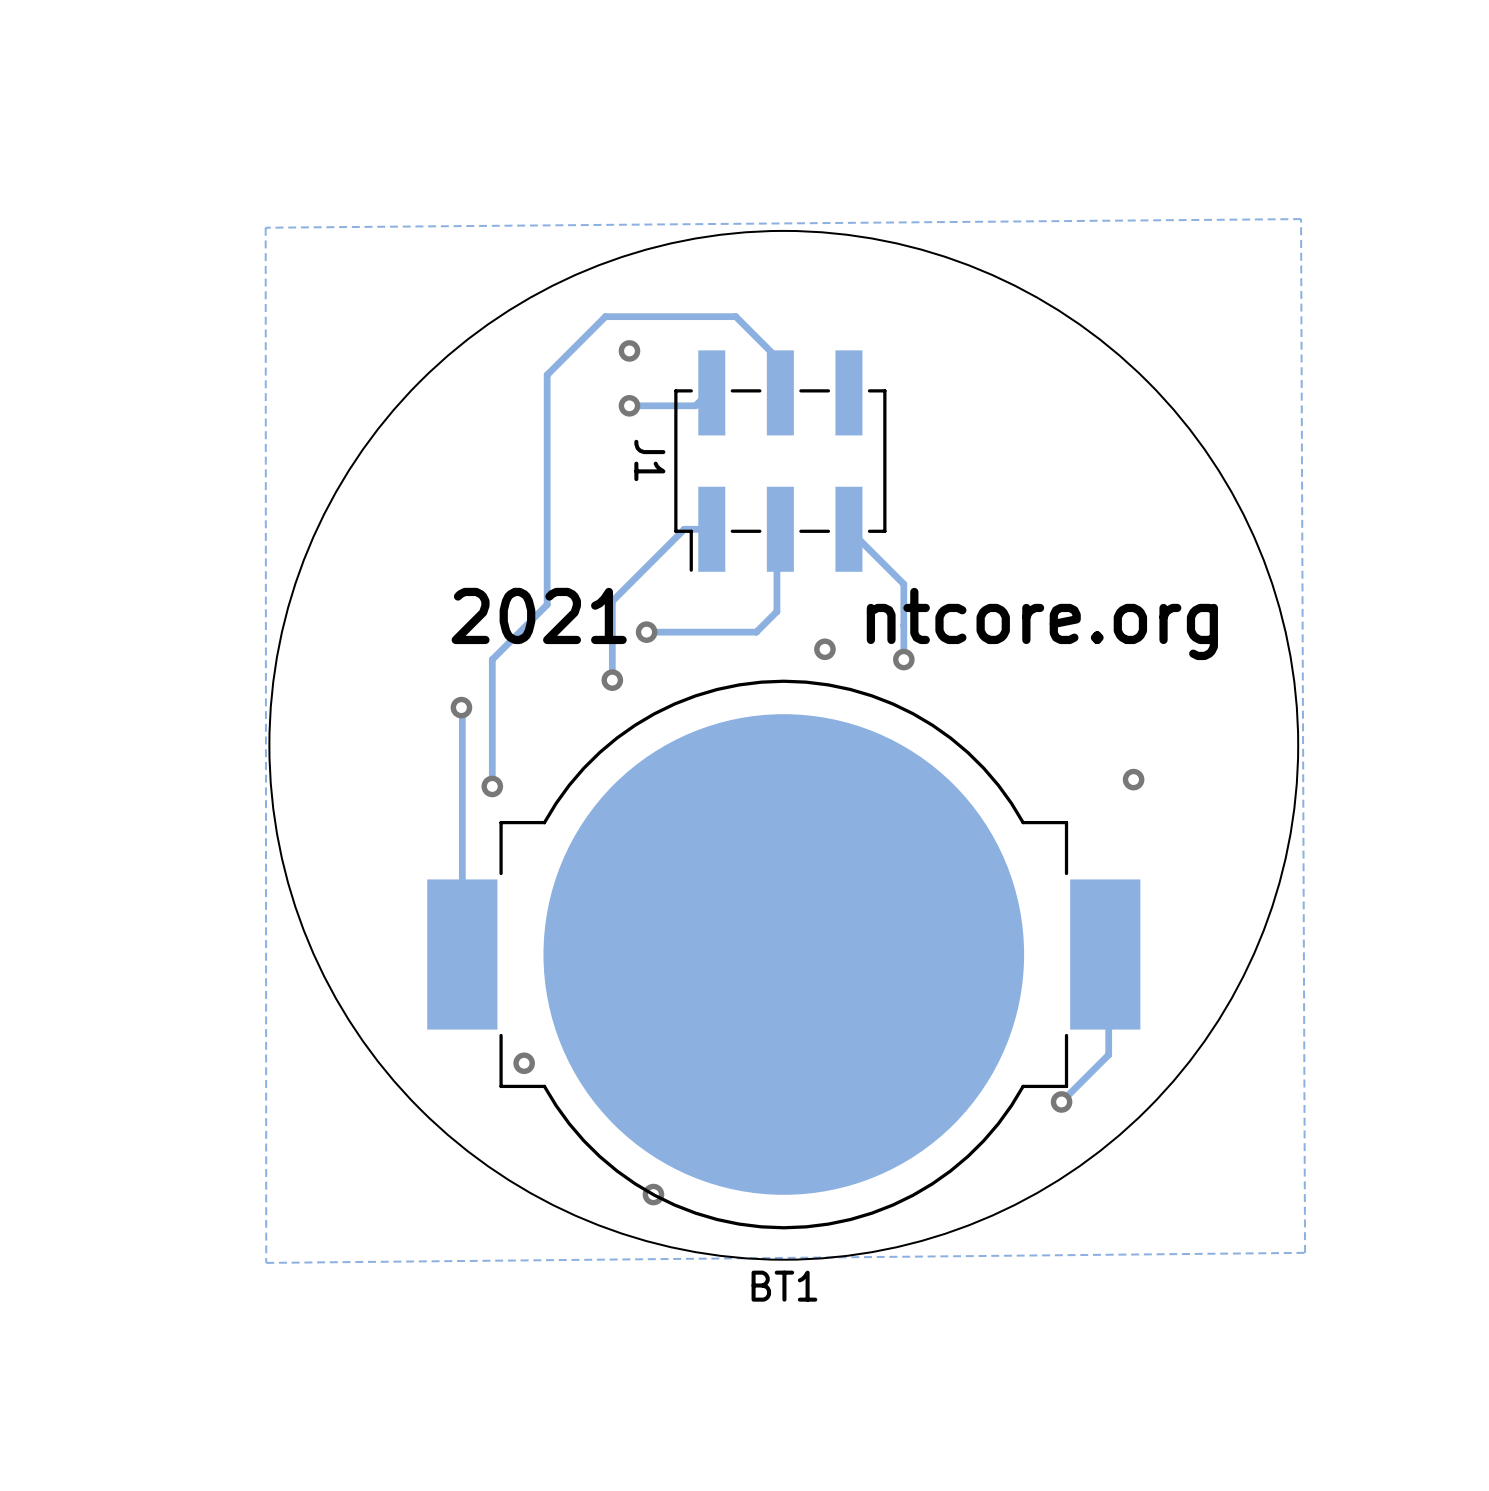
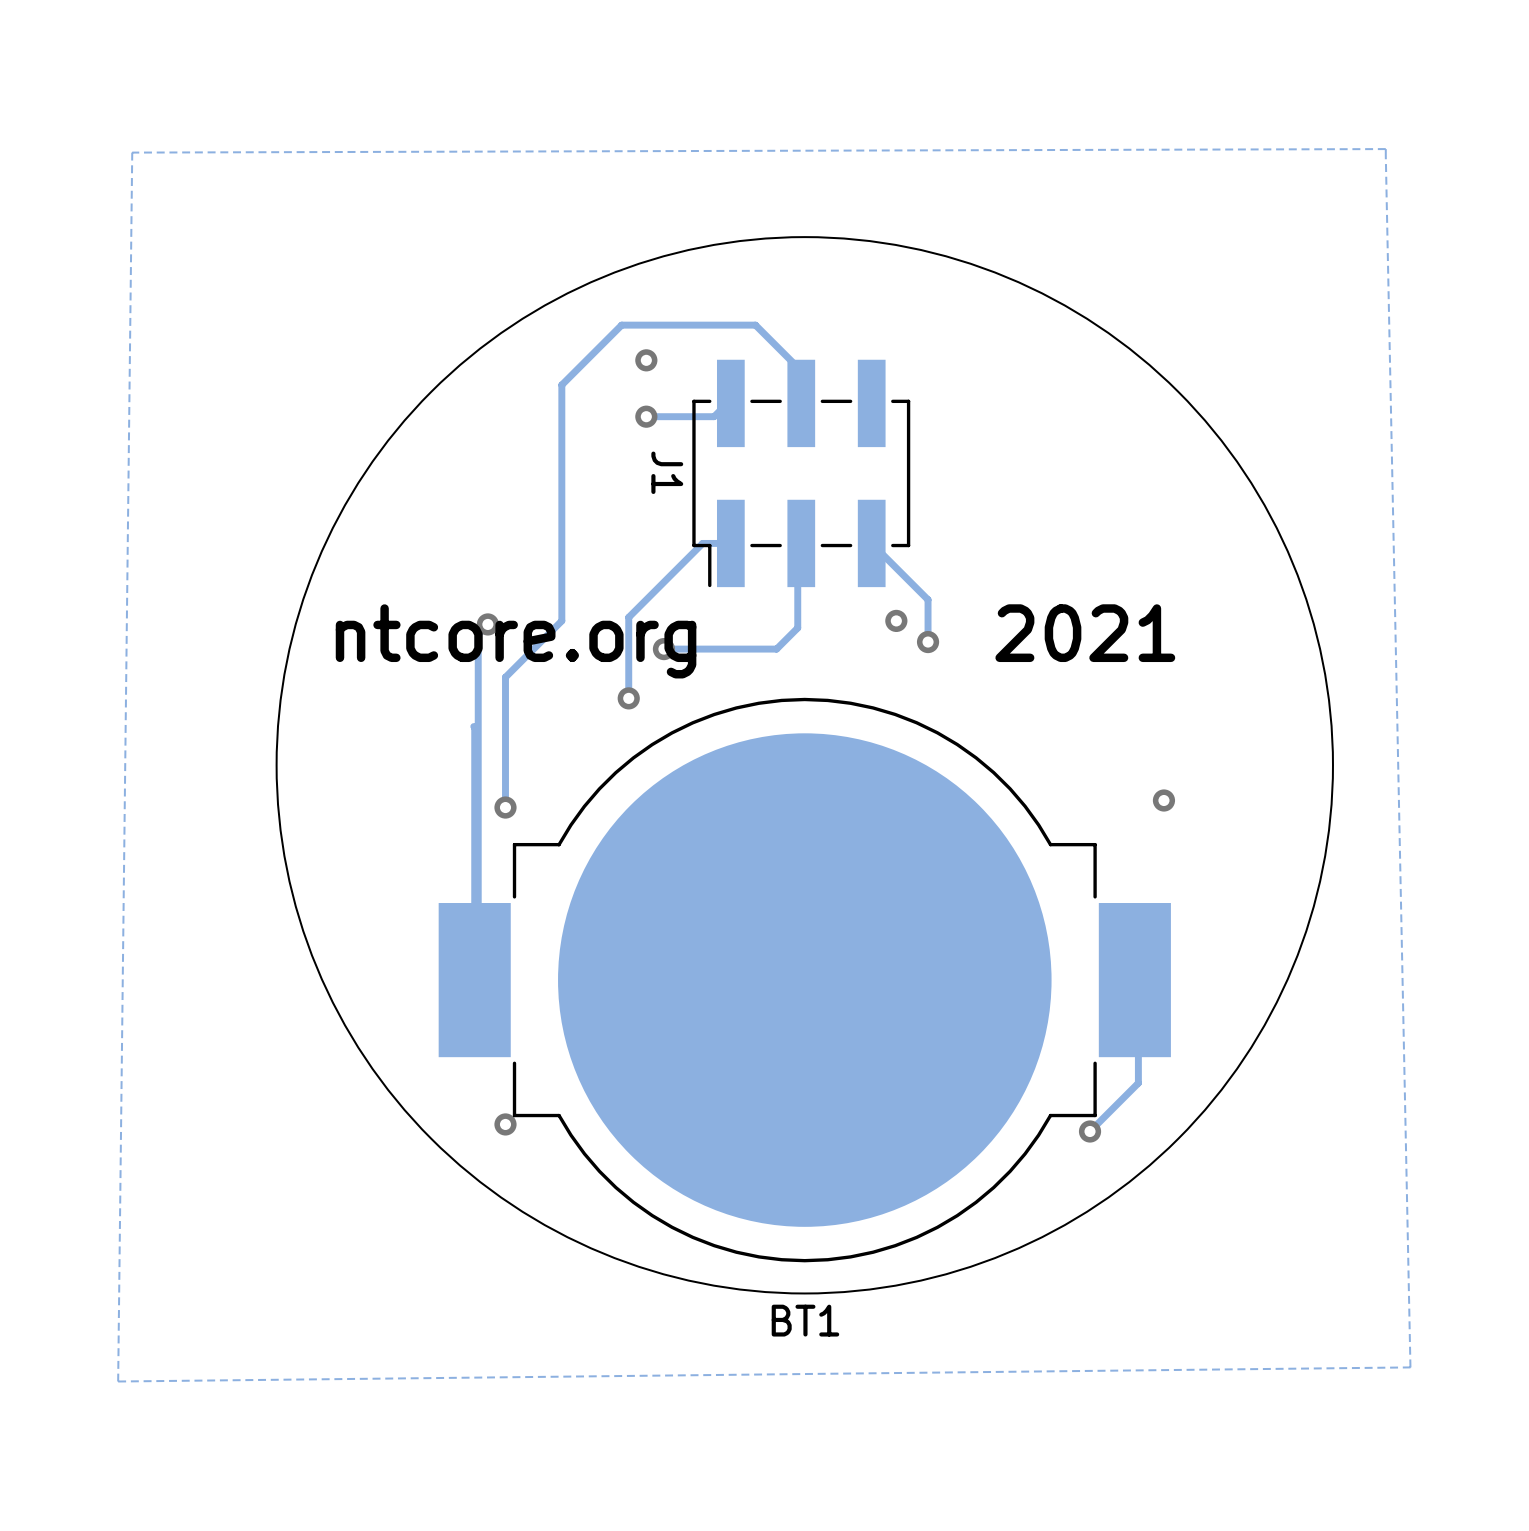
zone outline: (1301, 219) (1305, 1252) (266, 1262) (265, 227) (1301, 219) -> (1385, 149) (1410, 1367) (118, 1381) (132, 152) (1385, 149)
via: none -> (896, 620)
track: none -> (487, 624) (478, 634) (478, 980)
text position: 2021 (539, 615) -> 2021 (1085, 633)
text position: ntcore.org (1042, 623) -> ntcore.org (516, 641)
track: (903, 625) (903, 659) -> none
via: none -> (928, 642)
via: (824, 649) -> none
via: (903, 659) -> none
via position: (461, 707) -> (487, 624)
via position: (524, 1063) -> (505, 1124)
via: (653, 1194) -> none

